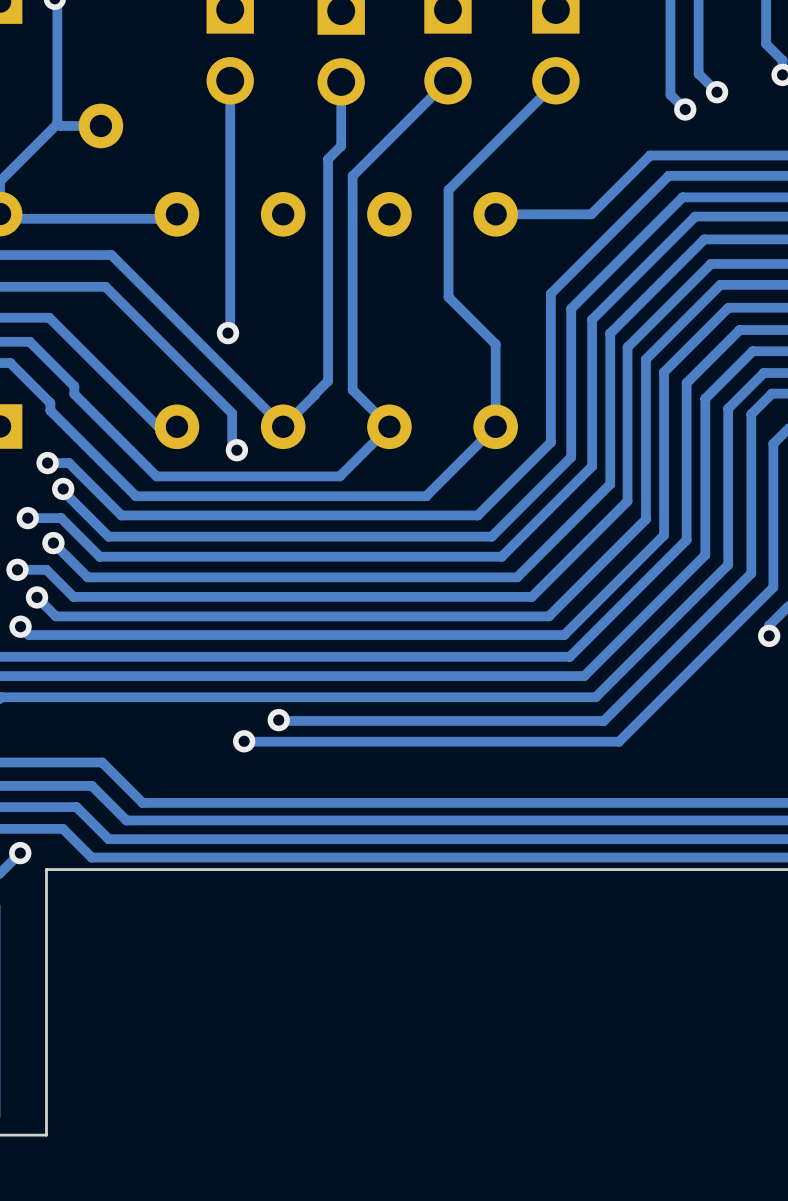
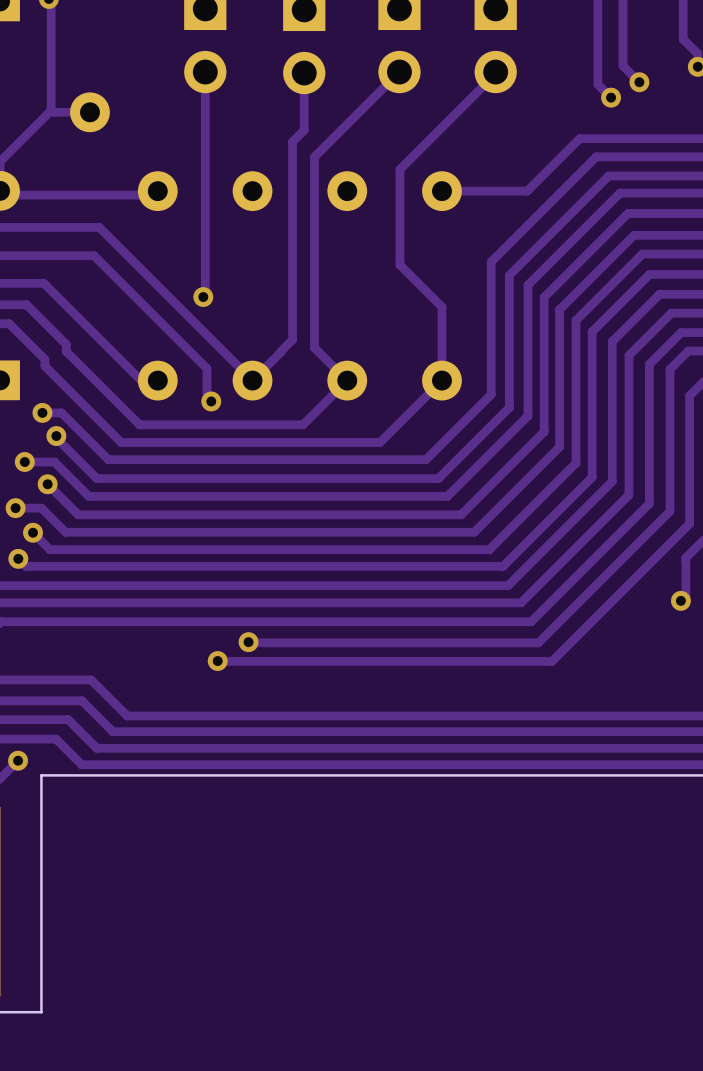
track: none -> (685, 567) (685, 595) (680, 600)
via position: (769, 635) -> (680, 600)

